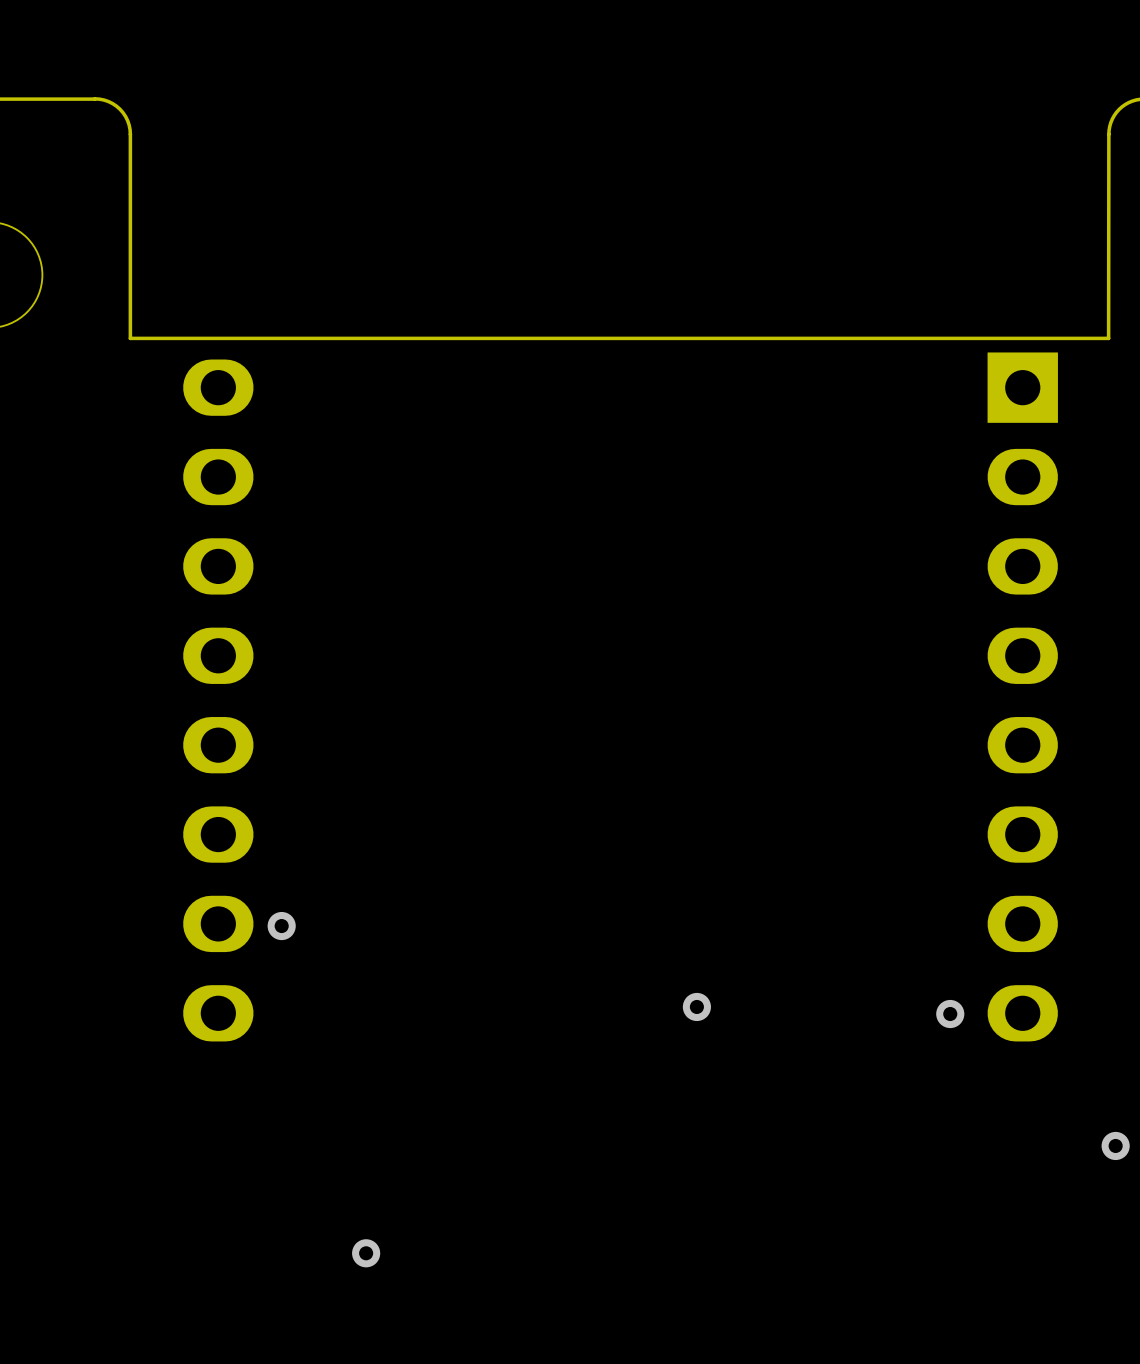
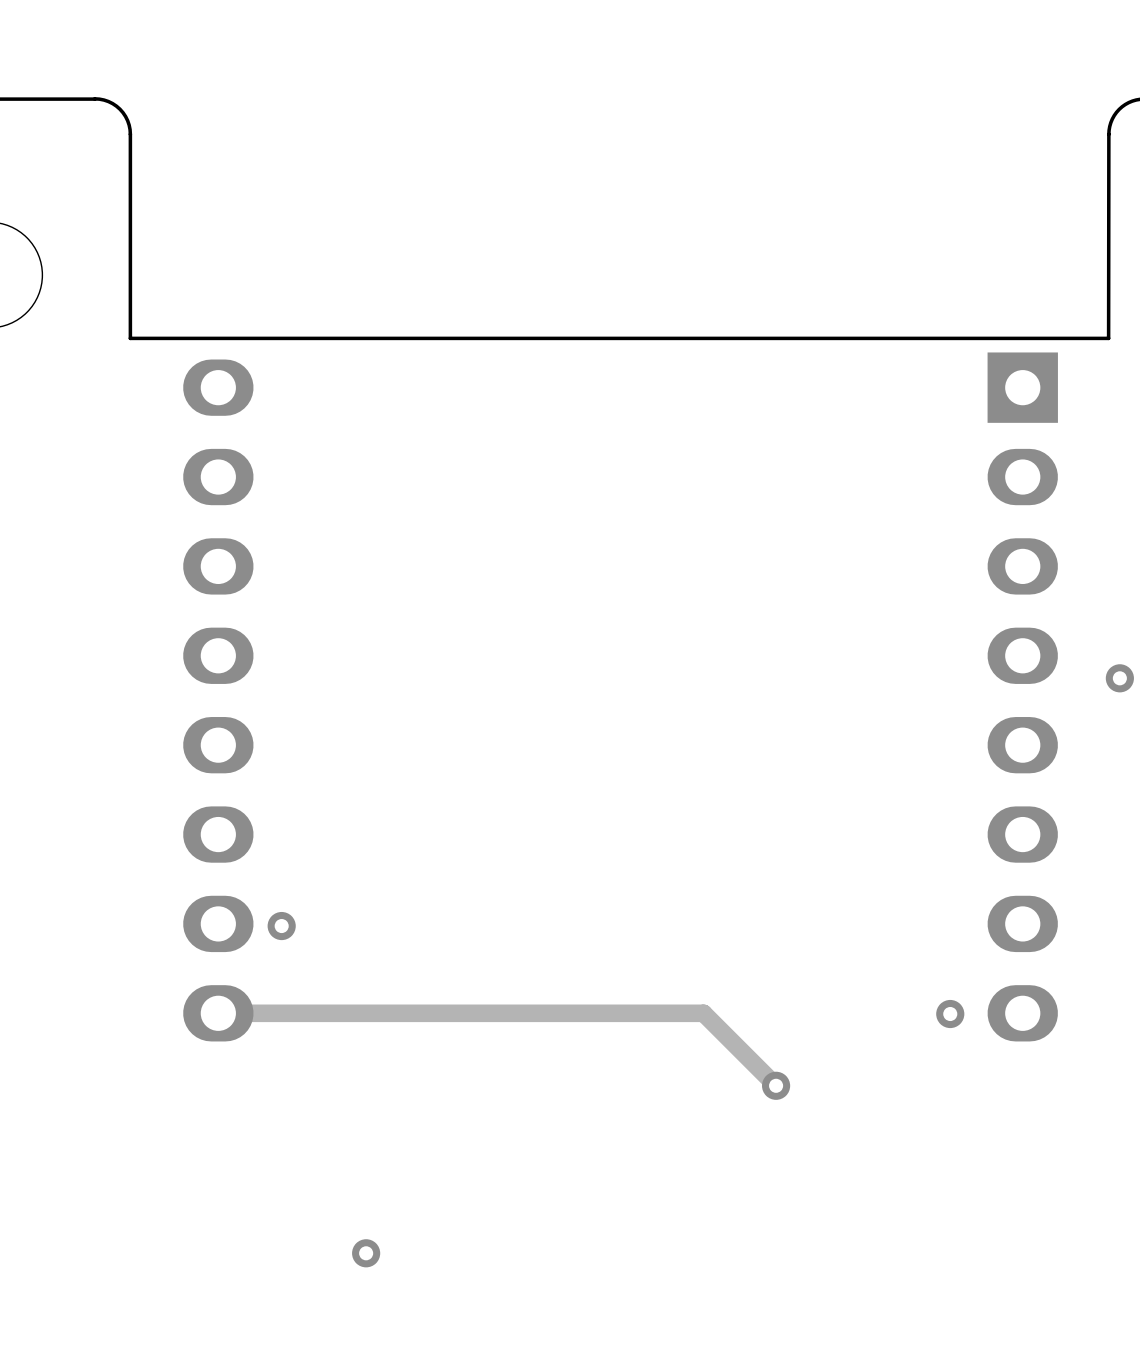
via: none -> (1119, 678)
via position: (696, 1006) -> (776, 1085)
track: none -> (218, 1013) (703, 1013) (776, 1085)
via: (1115, 1145) -> none

